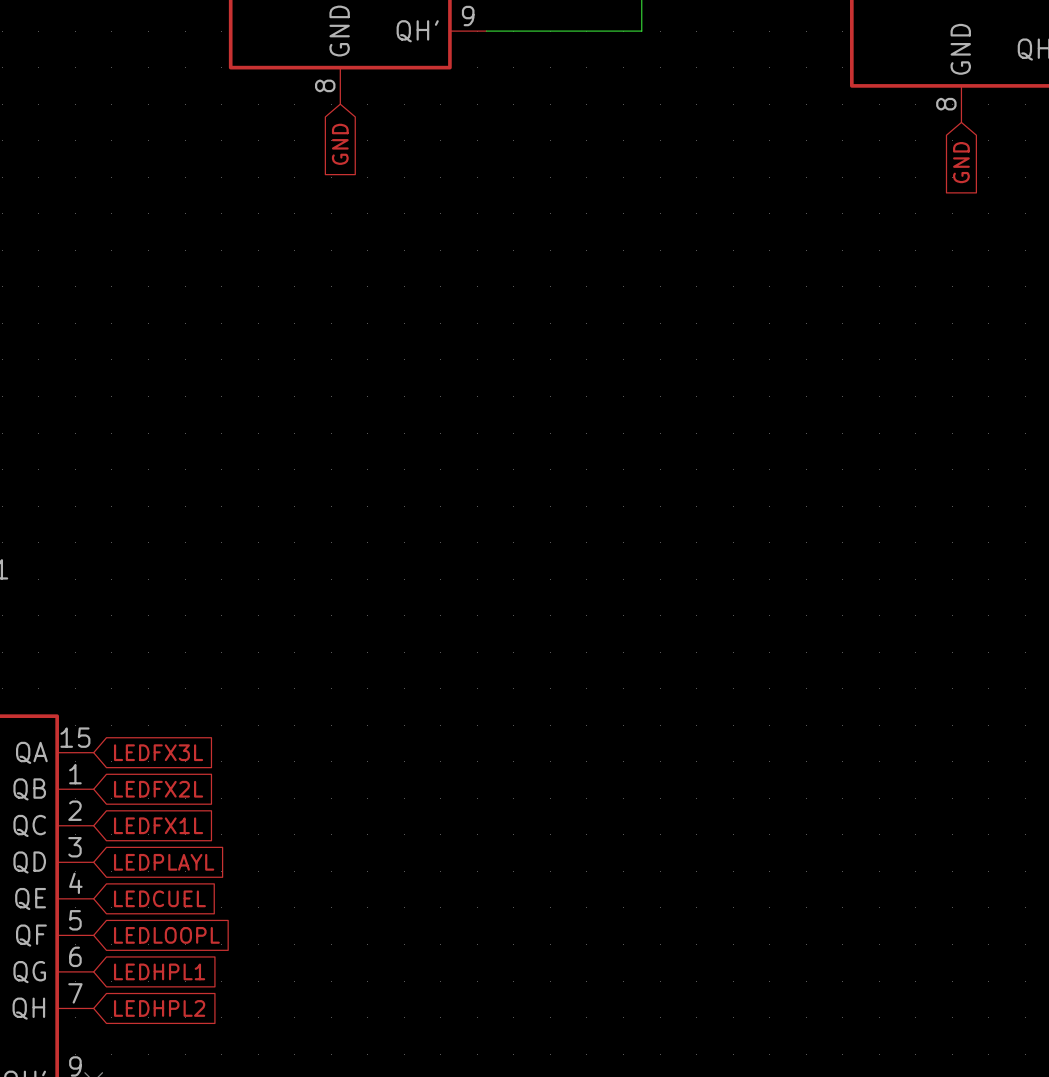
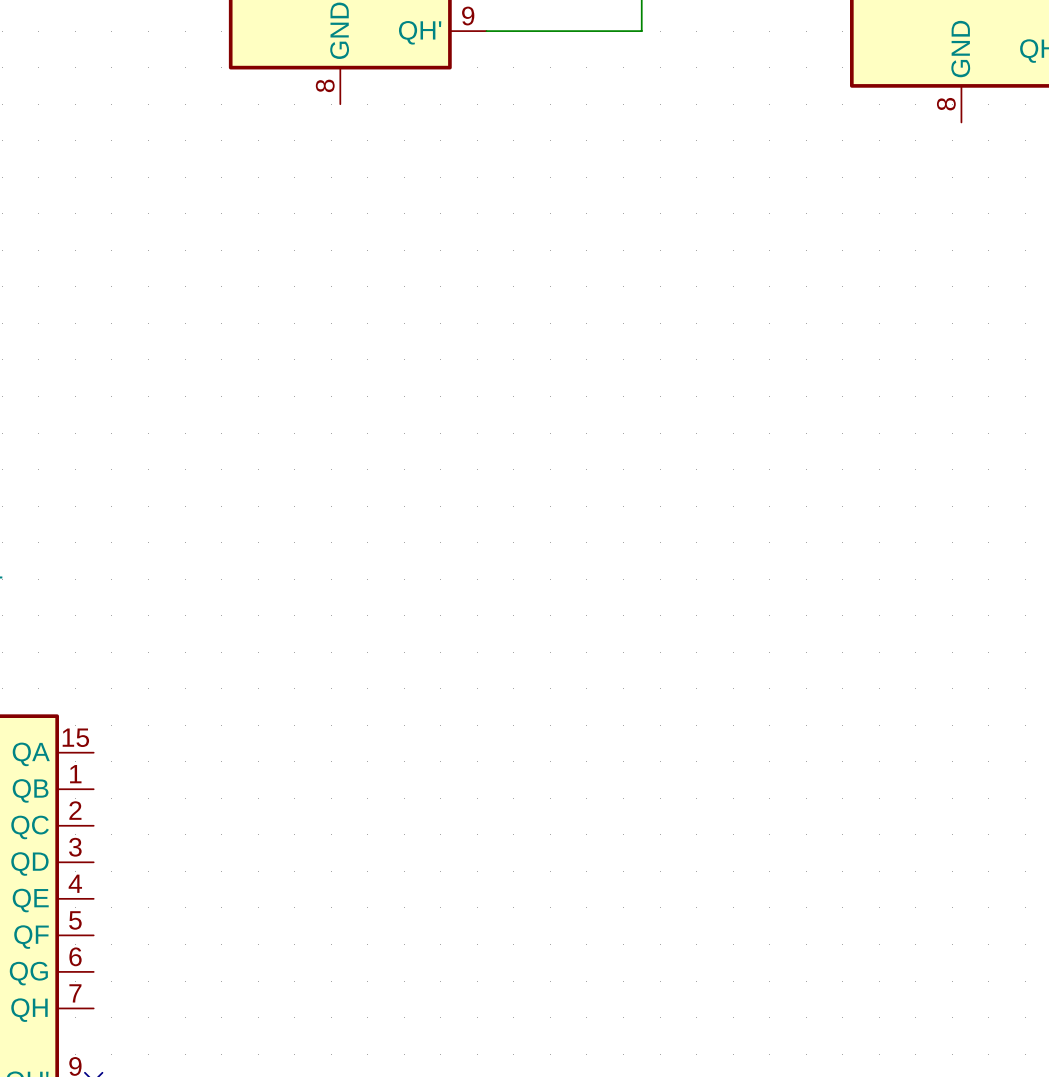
global label: GND (340, 144) -> none
global label: GND (961, 162) -> none
global label: LEDFX3L (158, 752) -> none
global label: LEDFX2L (158, 789) -> none
global label: LEDFX1L (158, 825) -> none
global label: LEDPLAYL (164, 862) -> none
global label: LEDCUEL (159, 898) -> none
global label: LEDLOOPL (166, 935) -> none
global label: LEDHPL1 (159, 971) -> none
global label: LEDHPL2 (159, 1008) -> none

